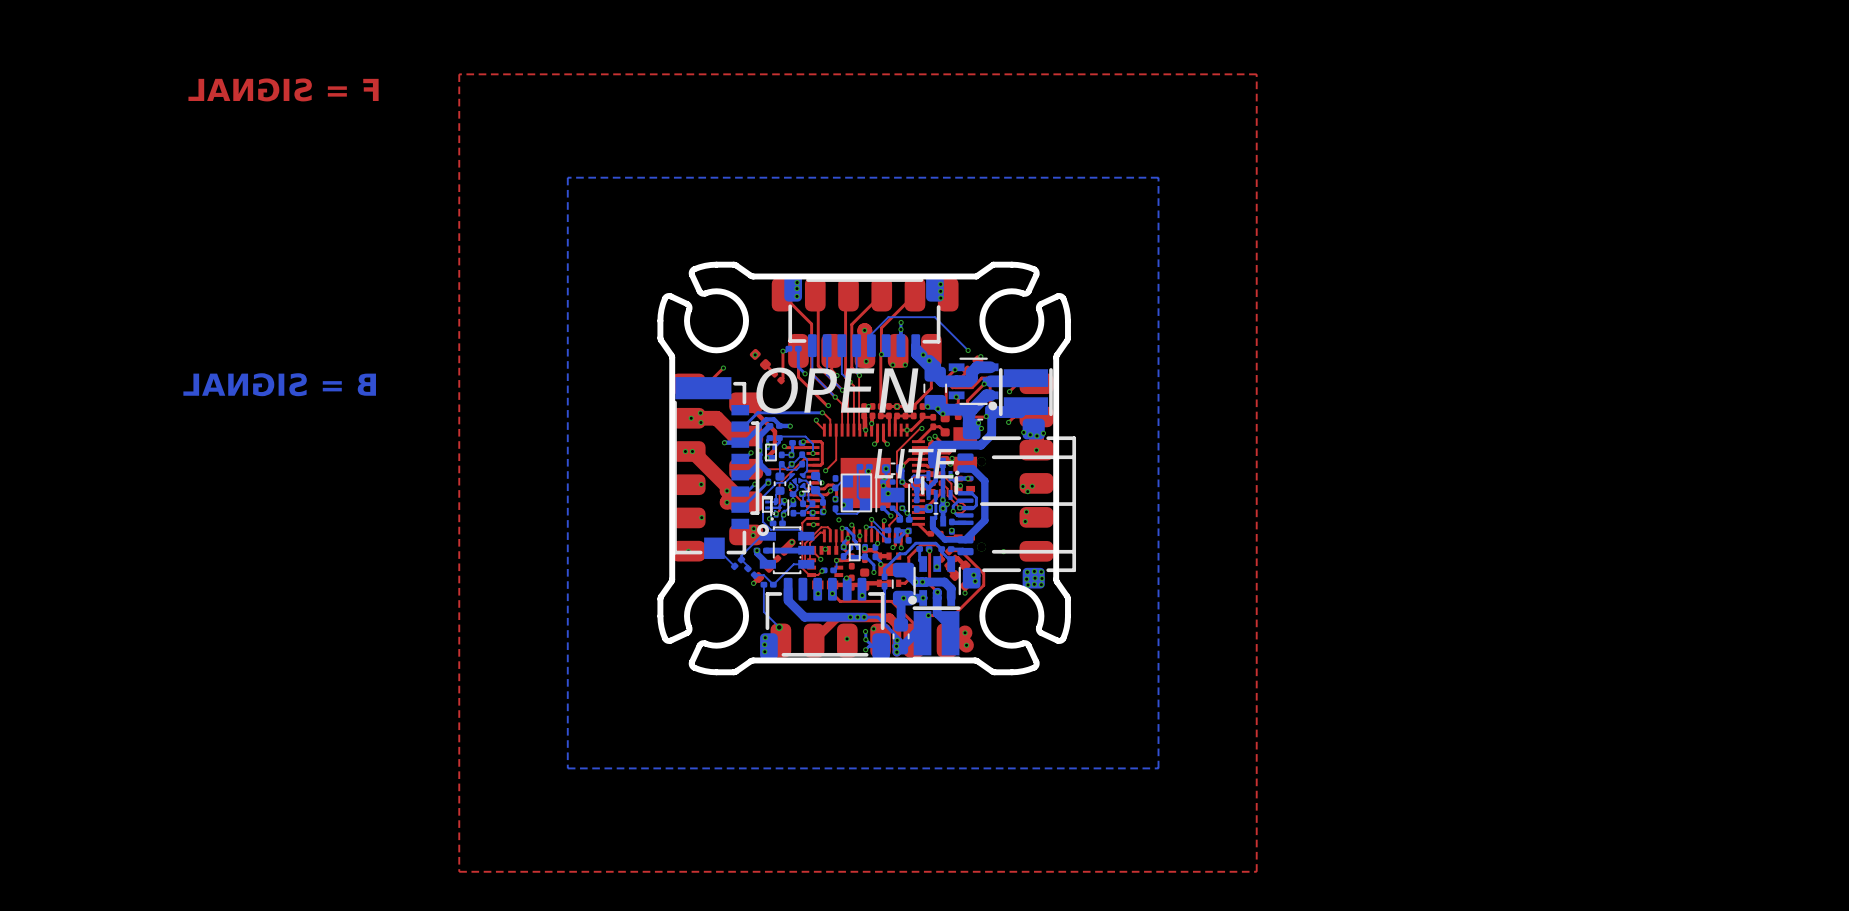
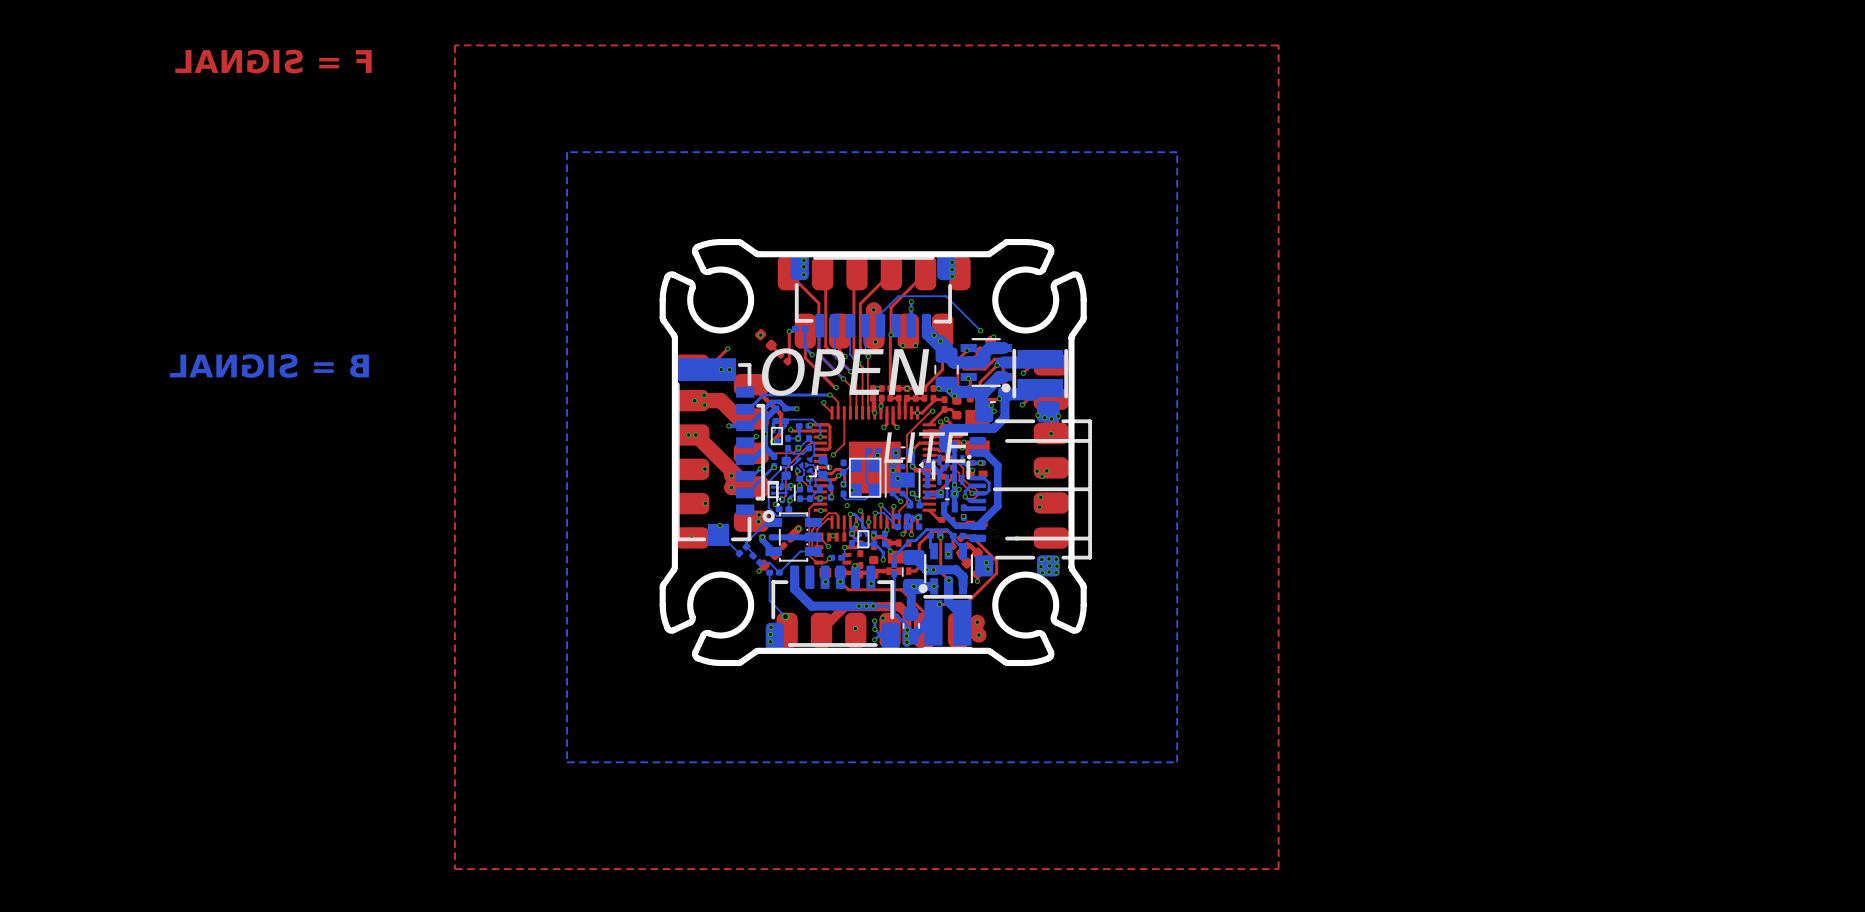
via: none -> (721, 369)
via: none -> (729, 369)
via: none -> (720, 525)

